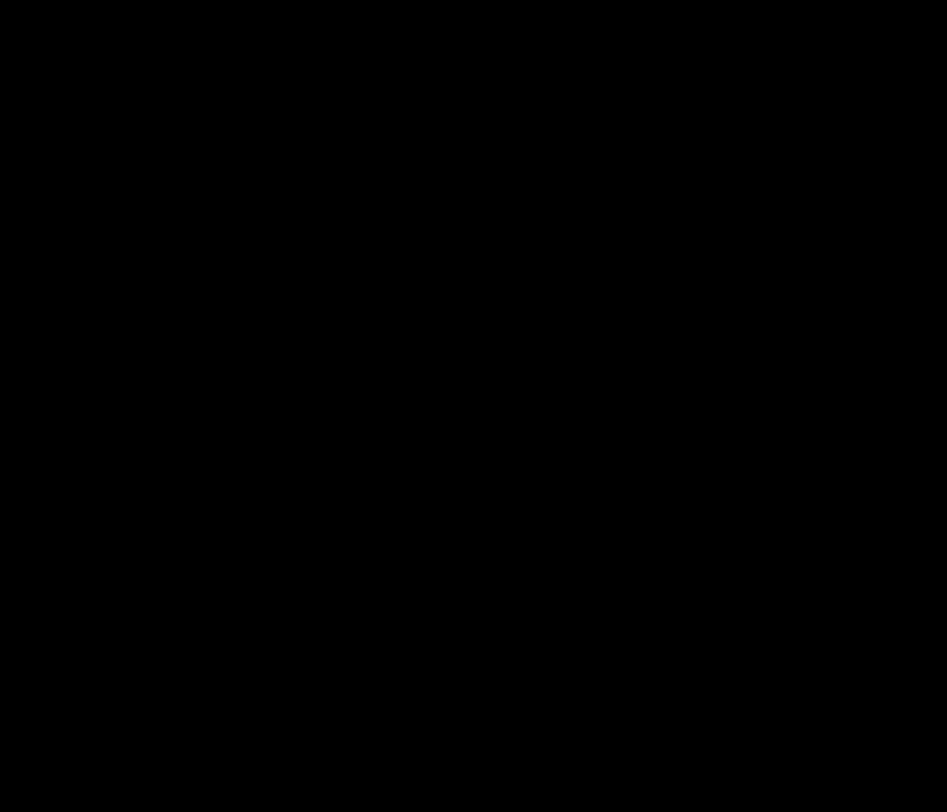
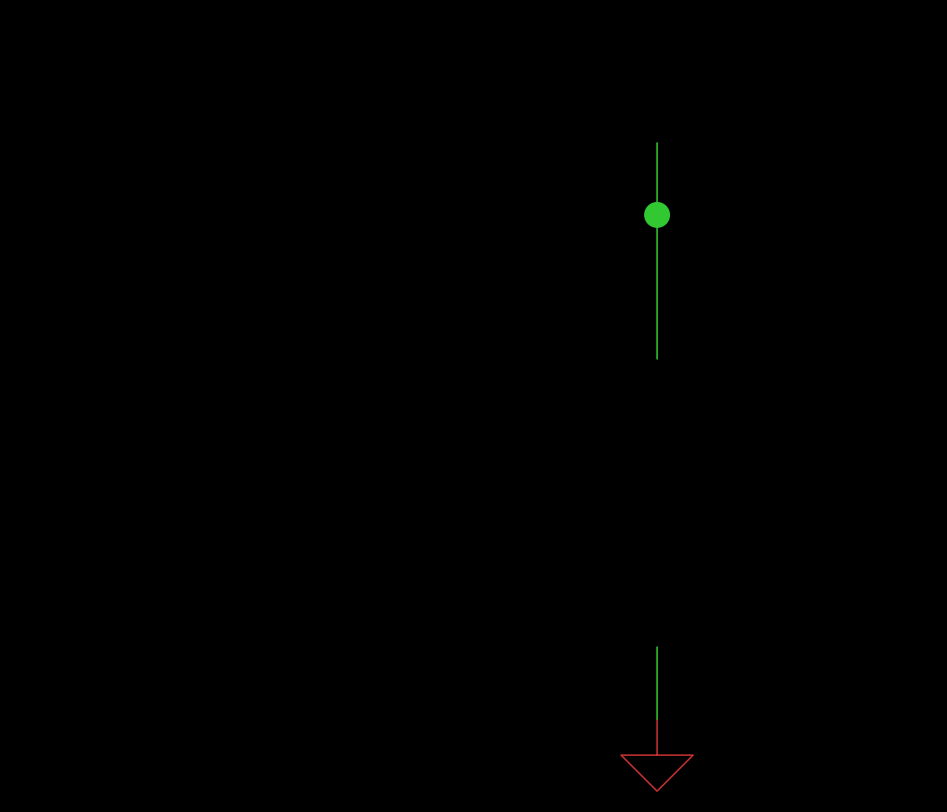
wire: none -> (657, 142) (657, 358)
junction: none -> (657, 214)
wire: none -> (657, 647) (657, 719)
power symbol: none -> (657, 755)

